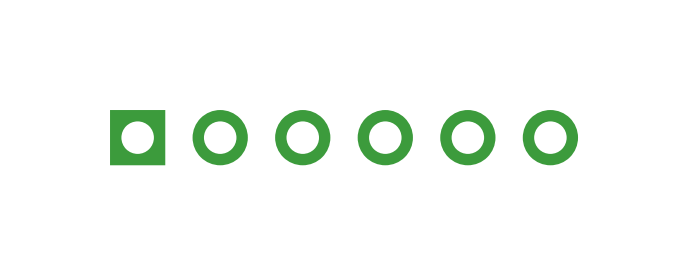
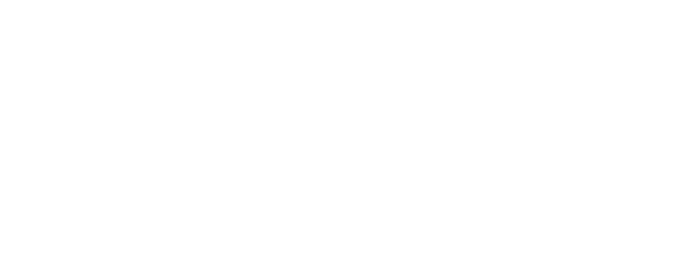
part: (344, 137) -> none

